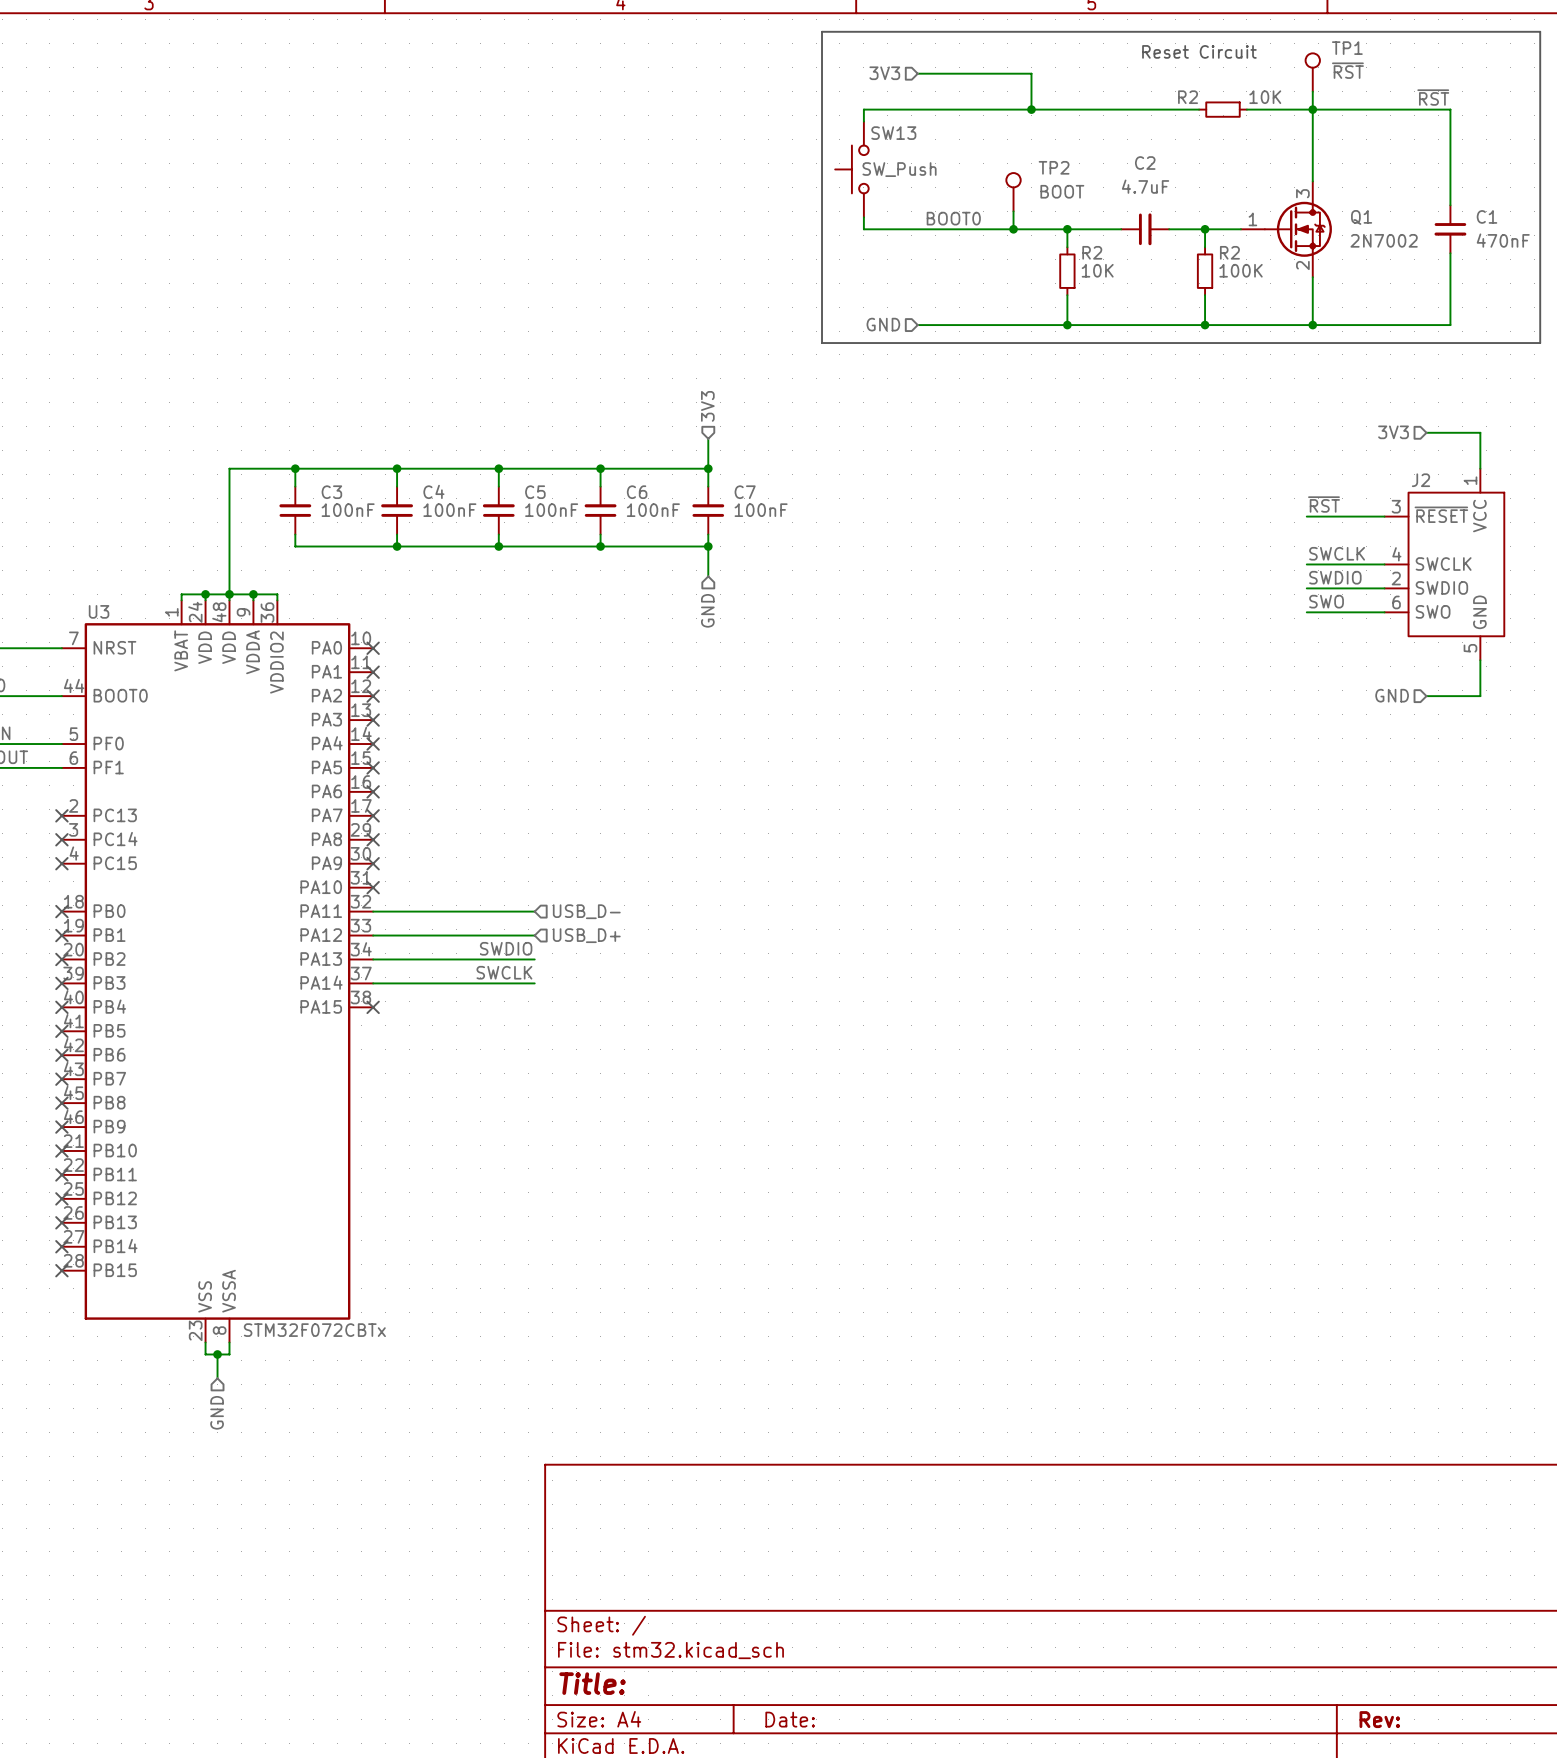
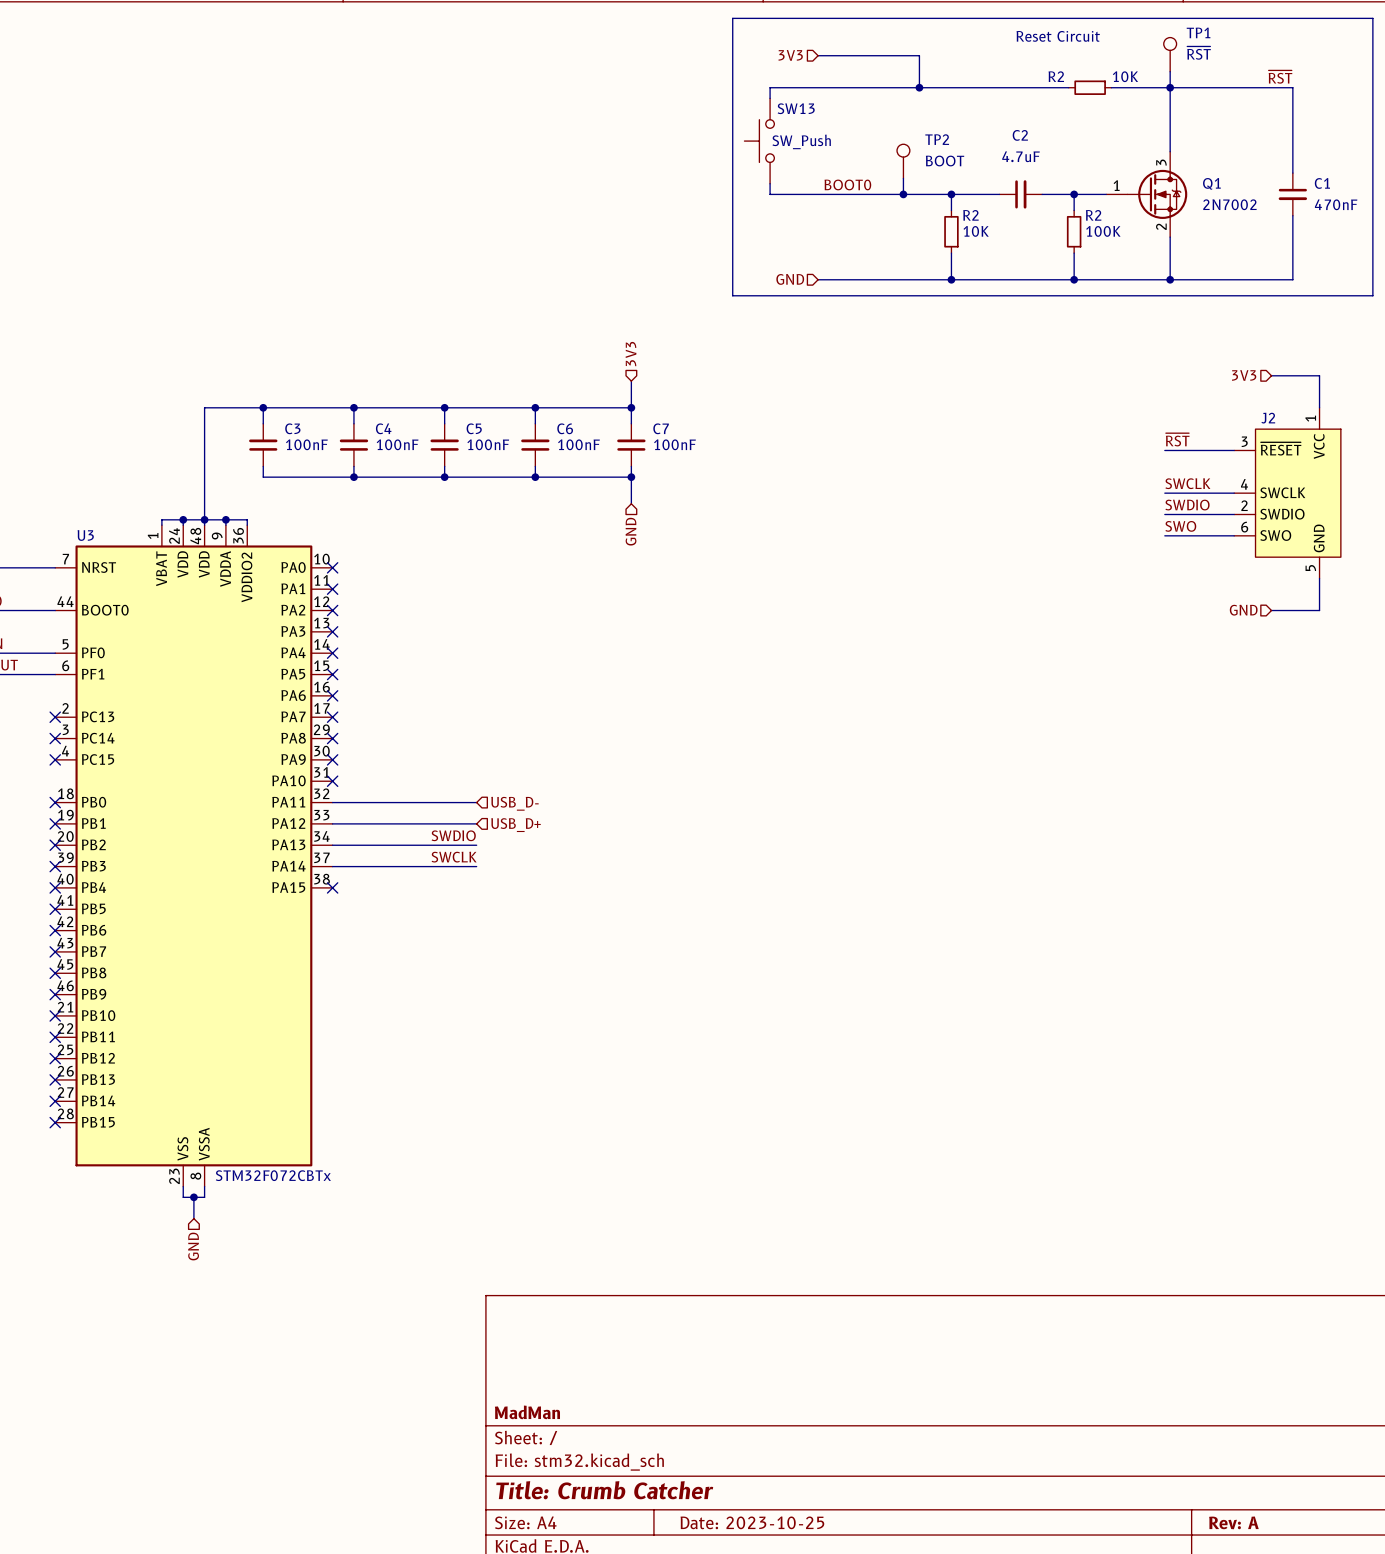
title block: none -> MadMan (527, 1412)
title block: Title: (592, 1683) -> Title: Crumb Catcher (604, 1490)
title block: Date: (790, 1719) -> Date: 2023-10-25 (752, 1522)
title block: Rev: (1379, 1719) -> Rev: A (1233, 1522)

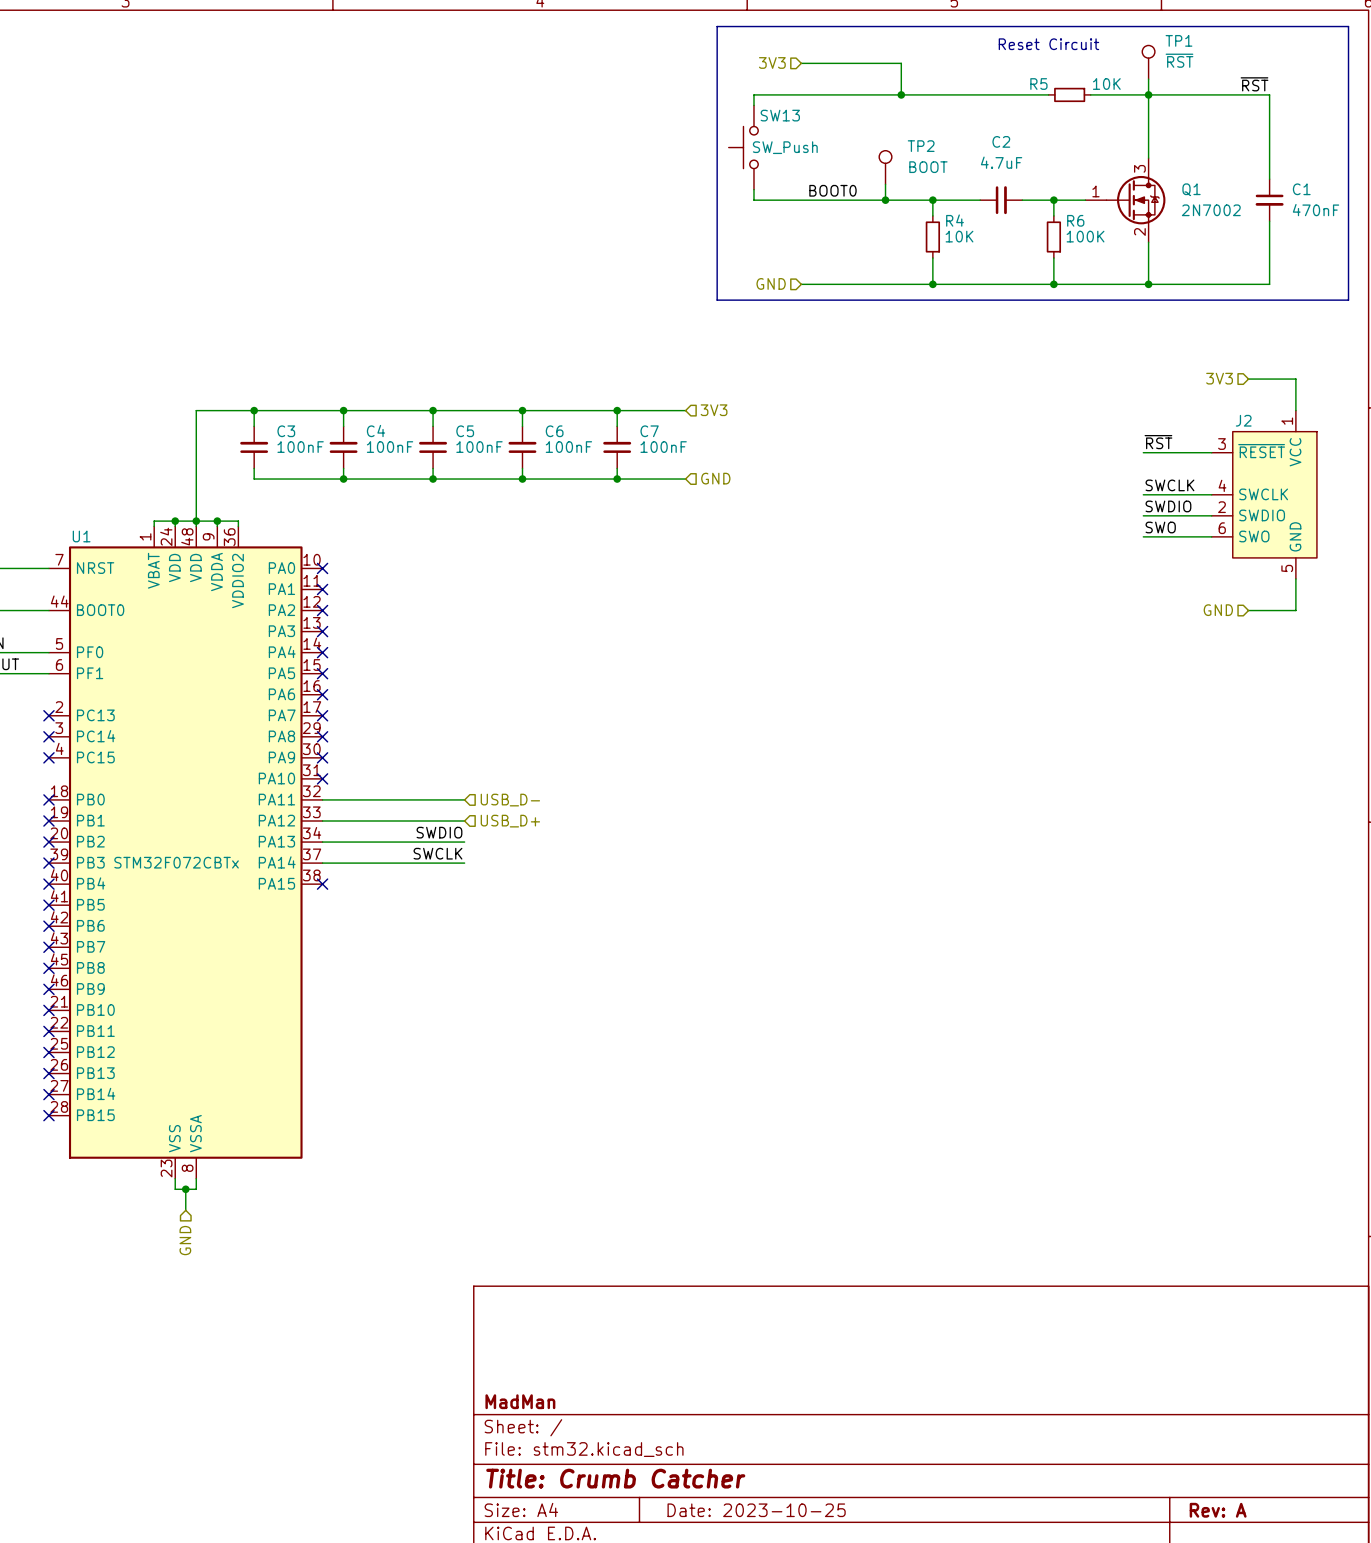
R2 name: R2 (1056, 76) -> R5 (1038, 84)
R2 name: R2 (970, 215) -> R4 (955, 220)
R2 name: R2 (1093, 215) -> R6 (1075, 220)
hierarchical label rotation: 0° (631, 354) -> 90° clockwise (714, 410)
hierarchical label position: 3V3 (631, 354) -> 3V3 (714, 410)
wire: (631, 381) (631, 407) -> (685, 410) (617, 410)
wire: (631, 477) (631, 503) -> (617, 479) (685, 479)
hierarchical label rotation: 0° (631, 531) -> 90° counterclockwise (715, 478)
hierarchical label position: GND (631, 531) -> GND (715, 478)
U3 name: U3 (85, 535) -> U1 (81, 536)
U3 value position: STM32F072CBTx (273, 1175) -> STM32F072CBTx (176, 862)

